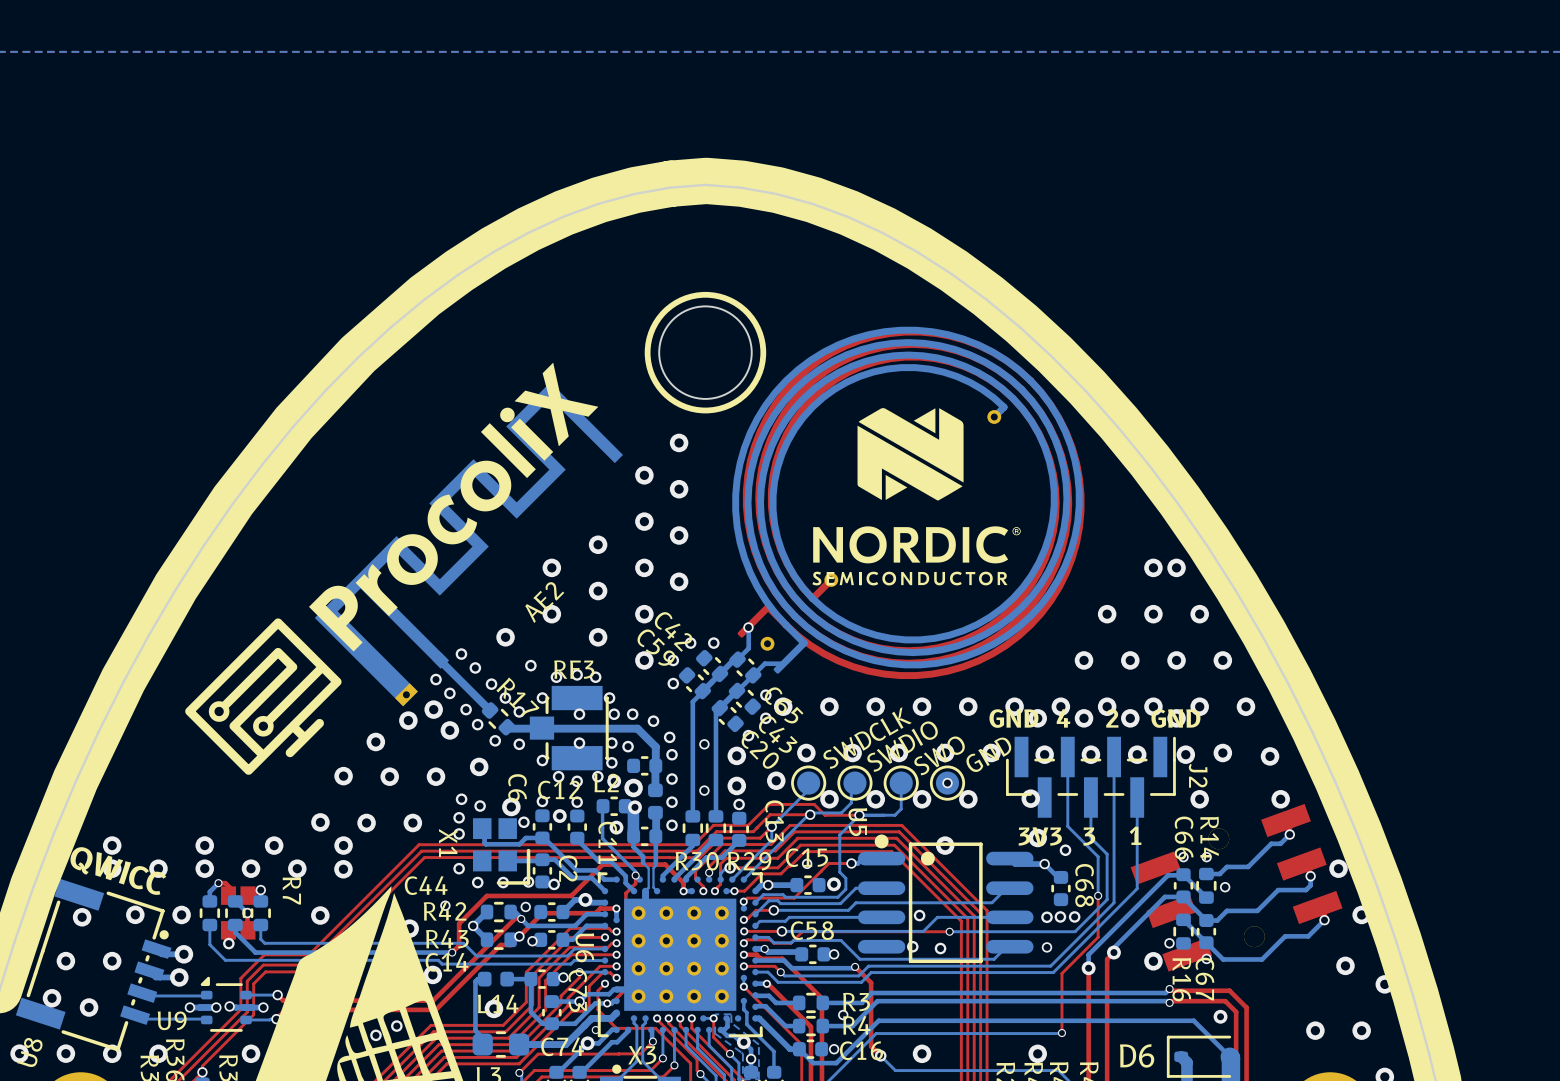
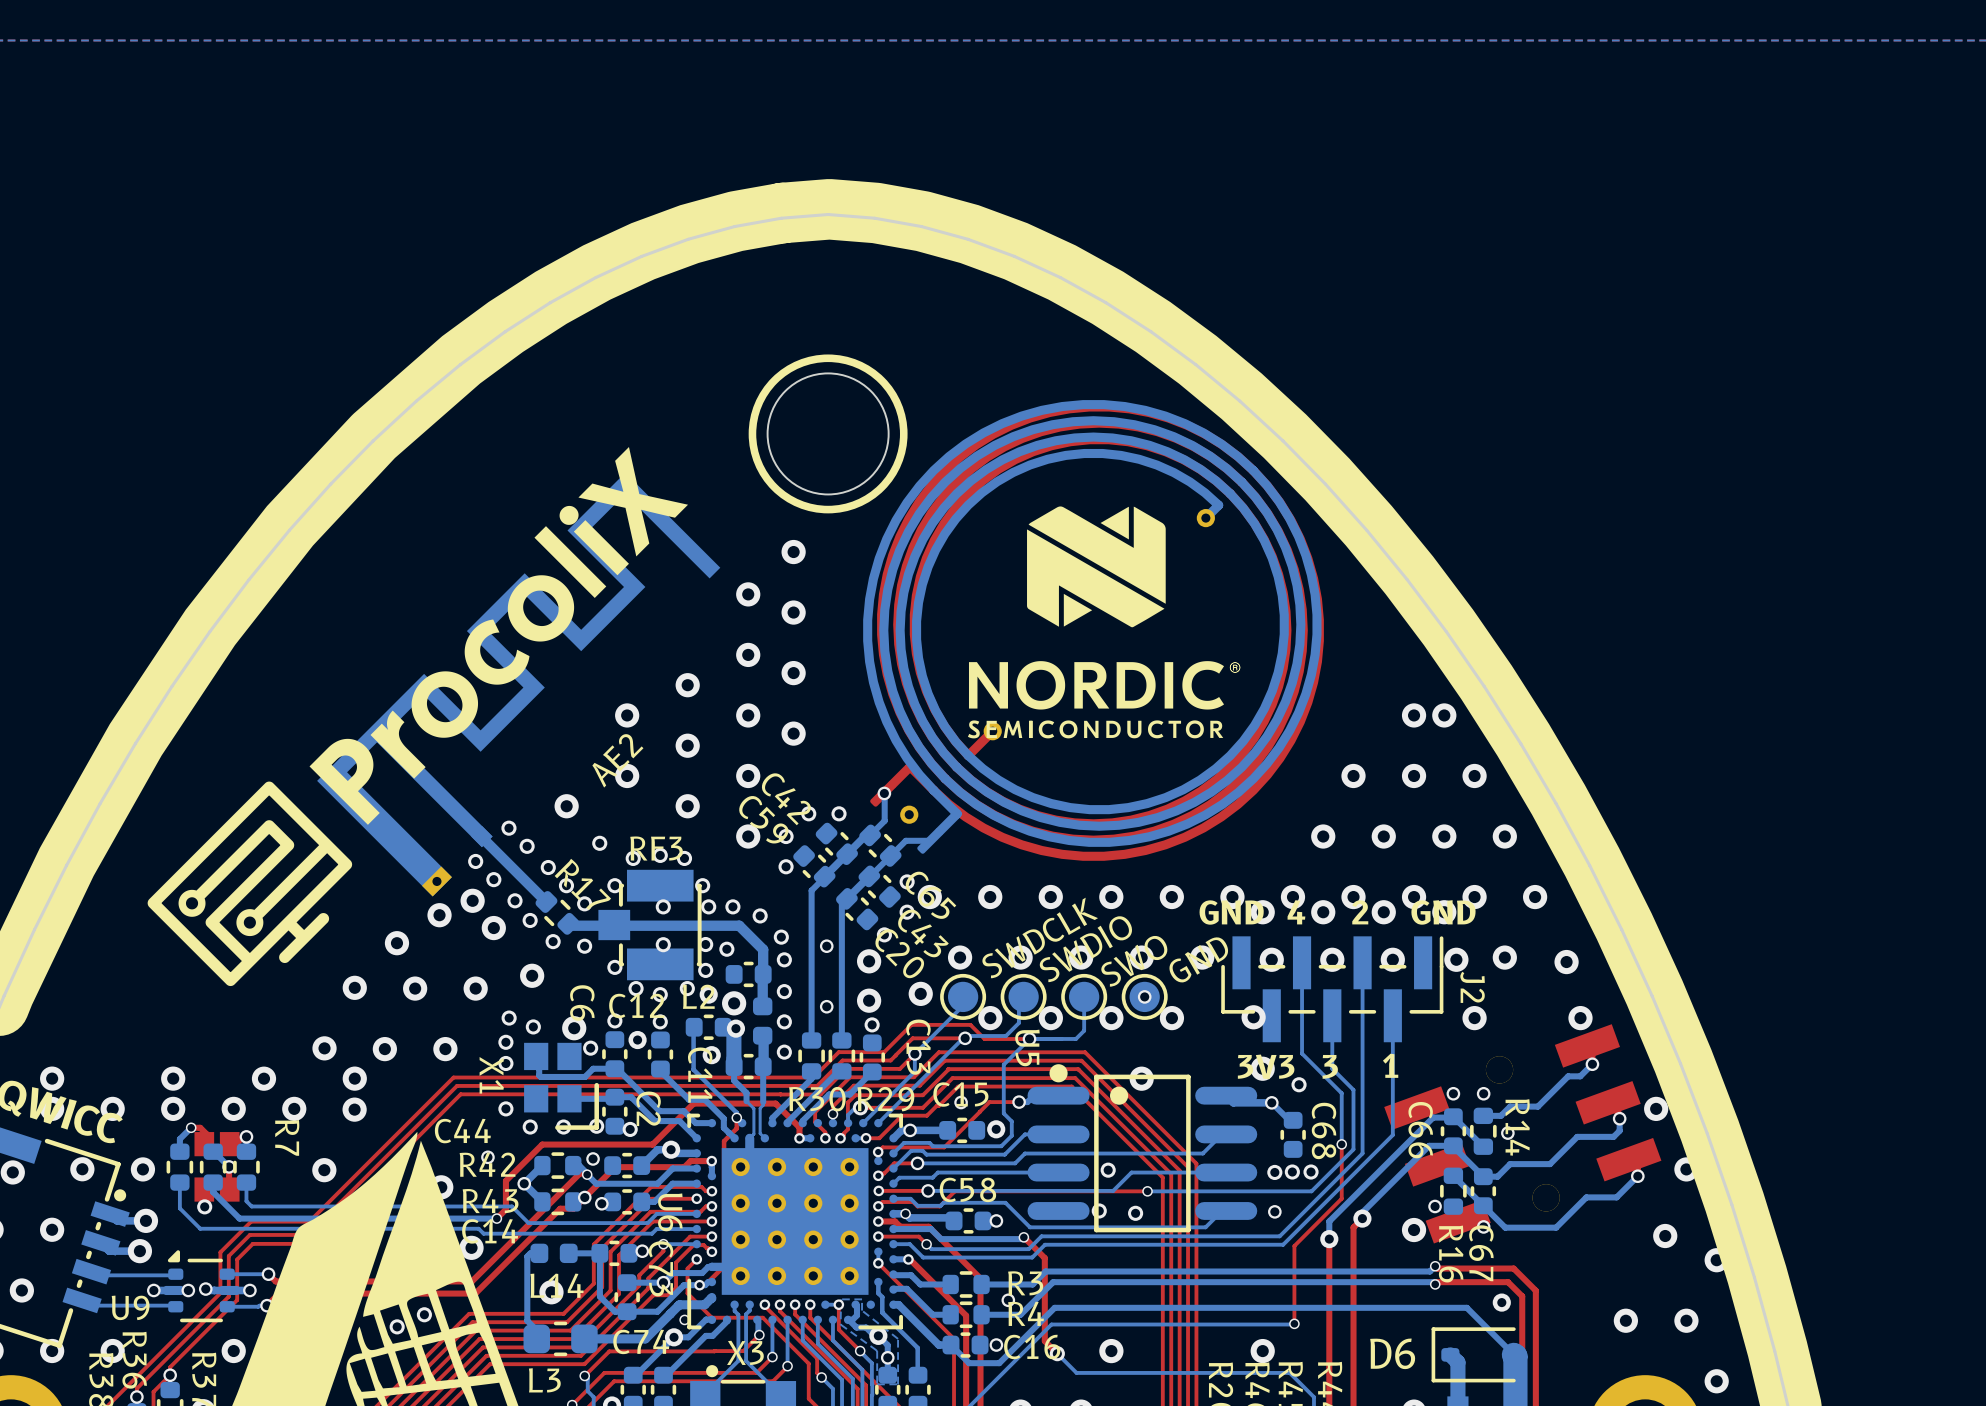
C66 name position: C66 (1184, 838) -> C66 (1420, 1130)
R14 name position: R14 (1209, 838) -> R14 (1517, 1127)

